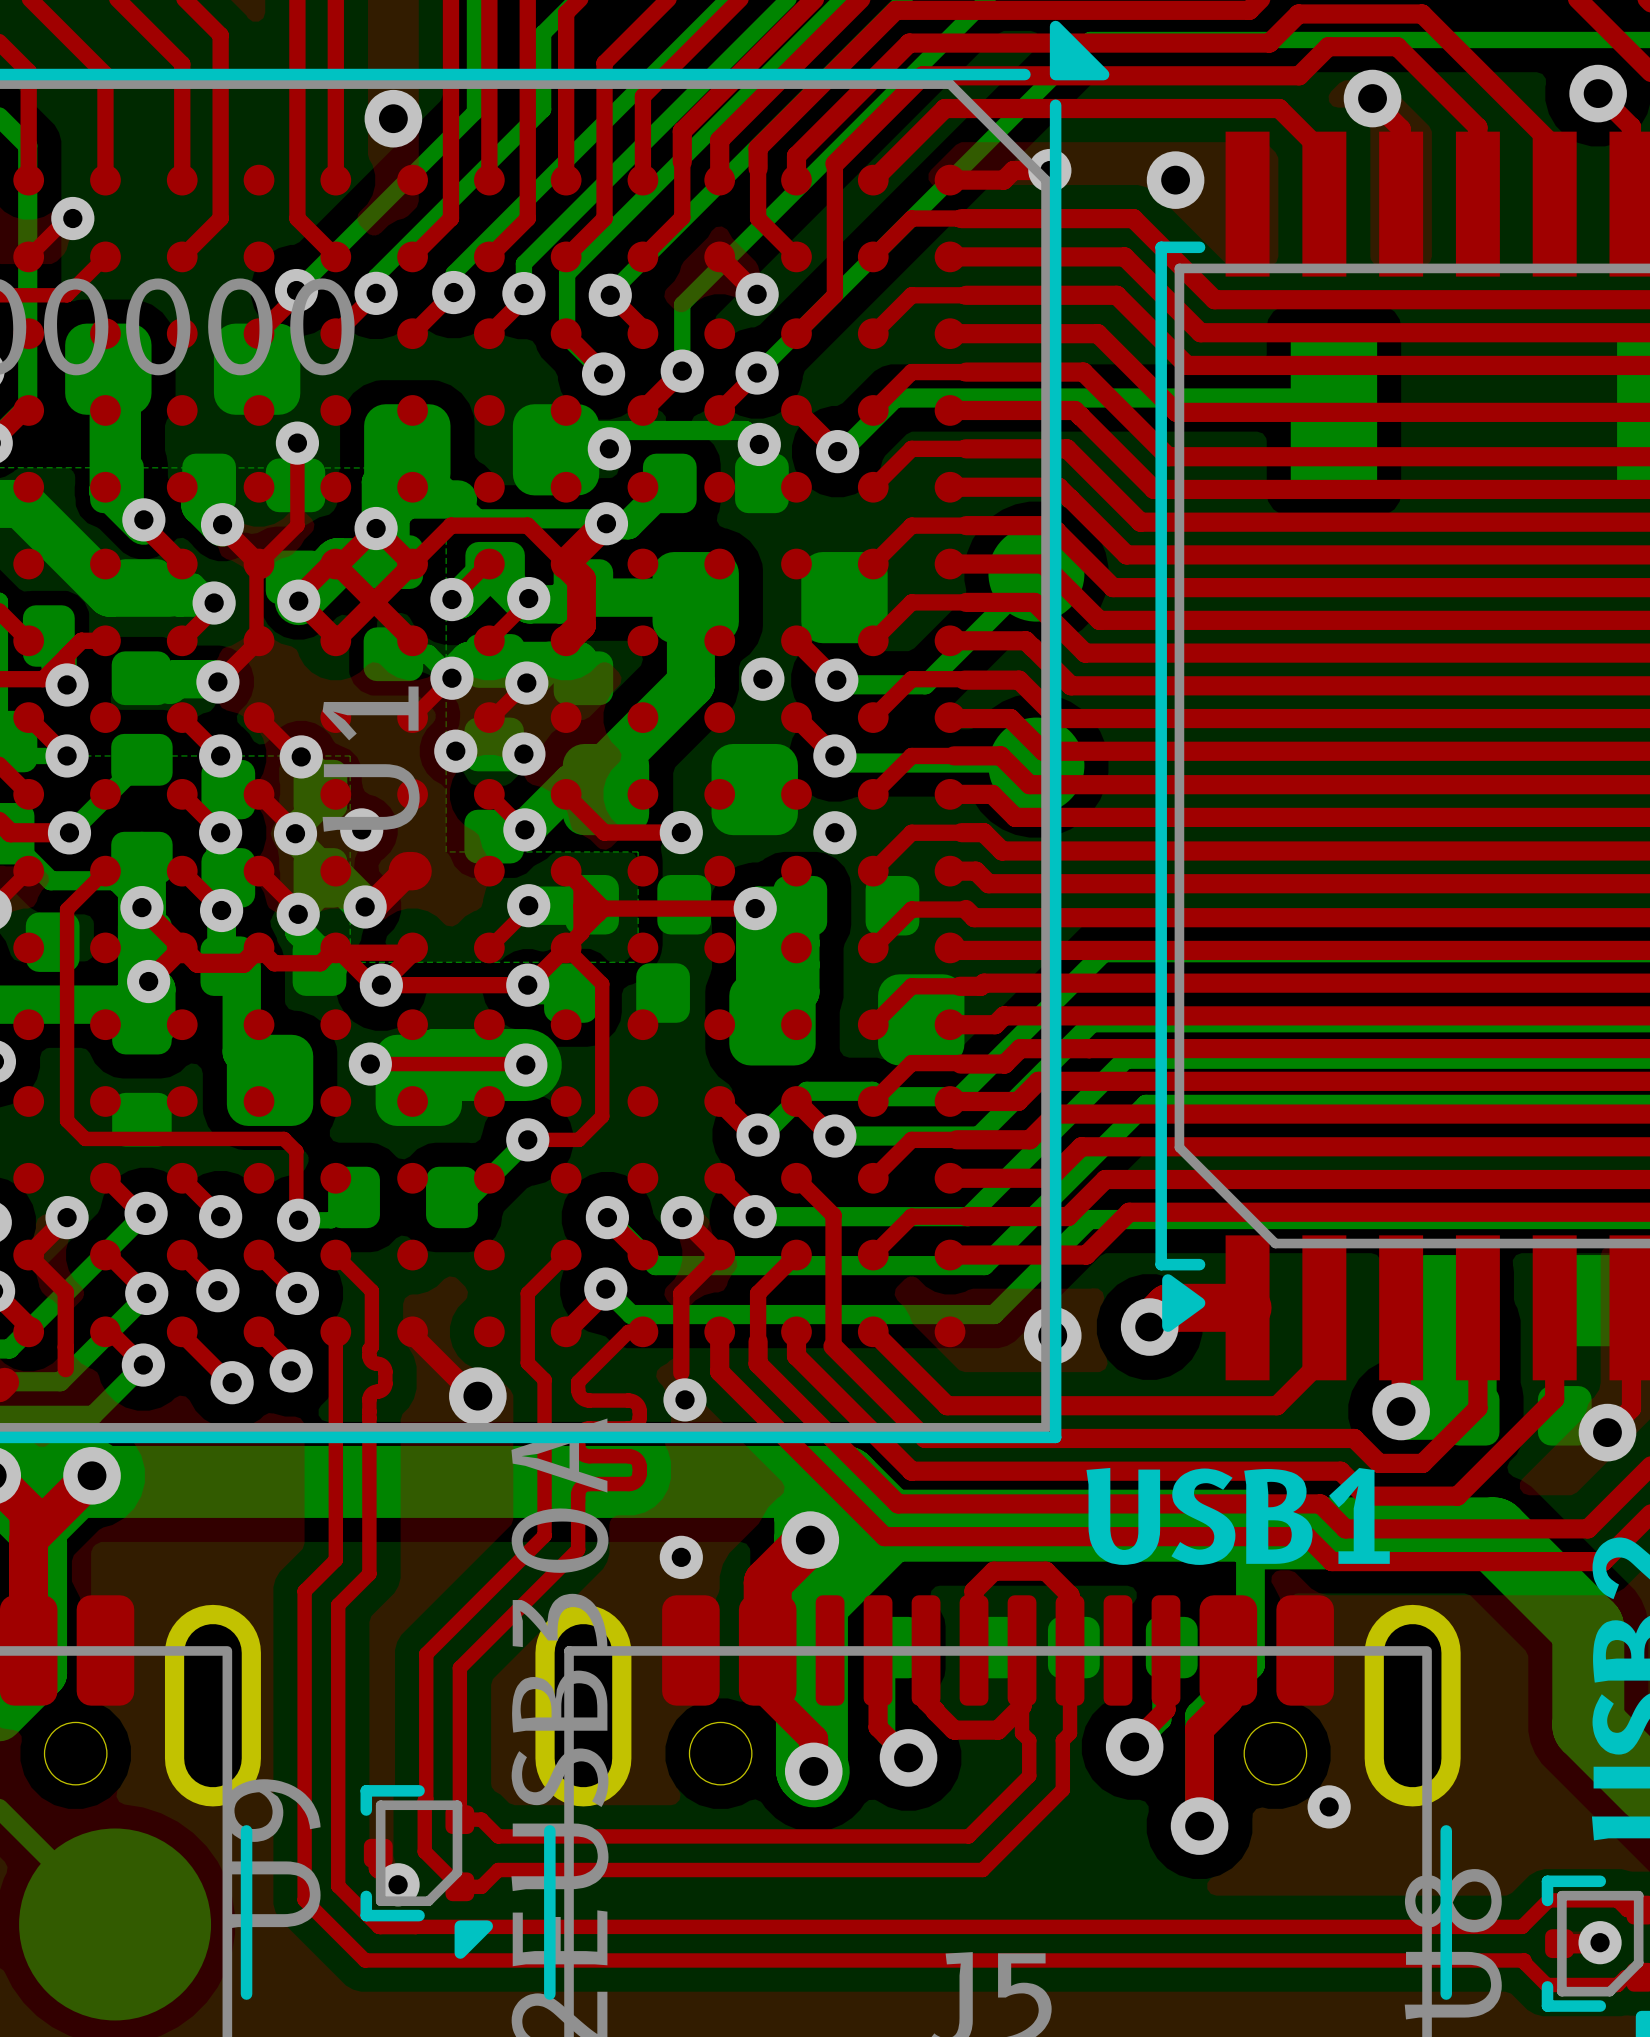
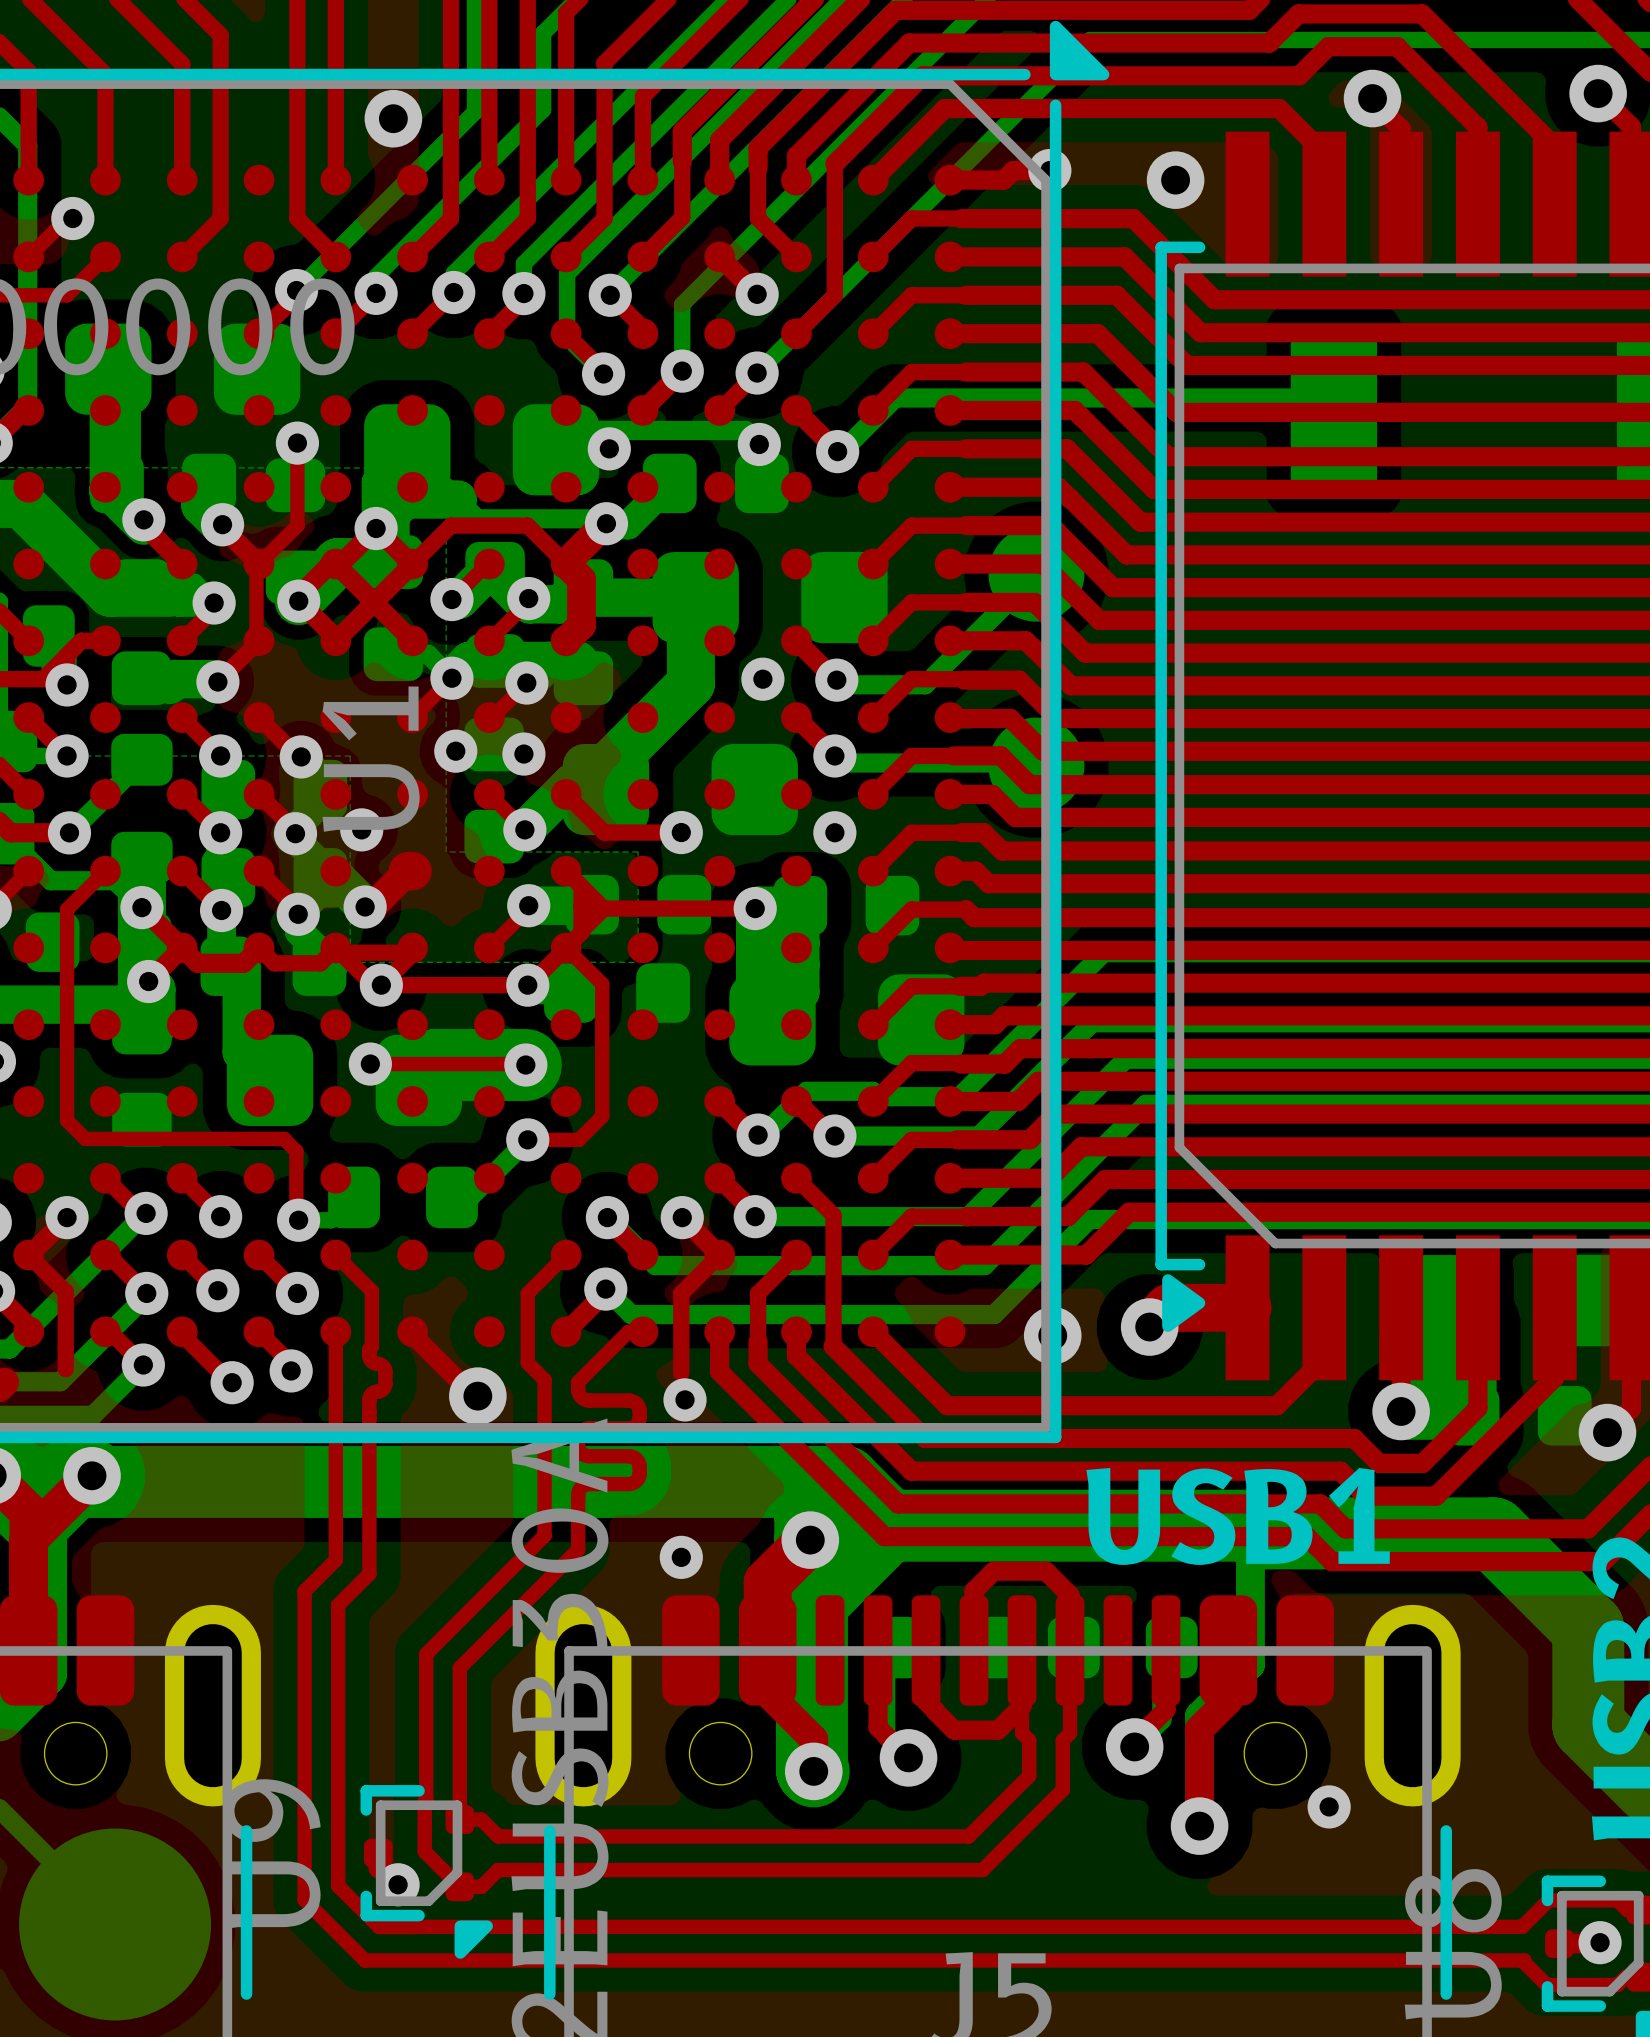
top track: (1554, 1377) (1554, 1399) (1457, 1496) (1436, 1496) -> (1554, 1377) (1436, 1496)

